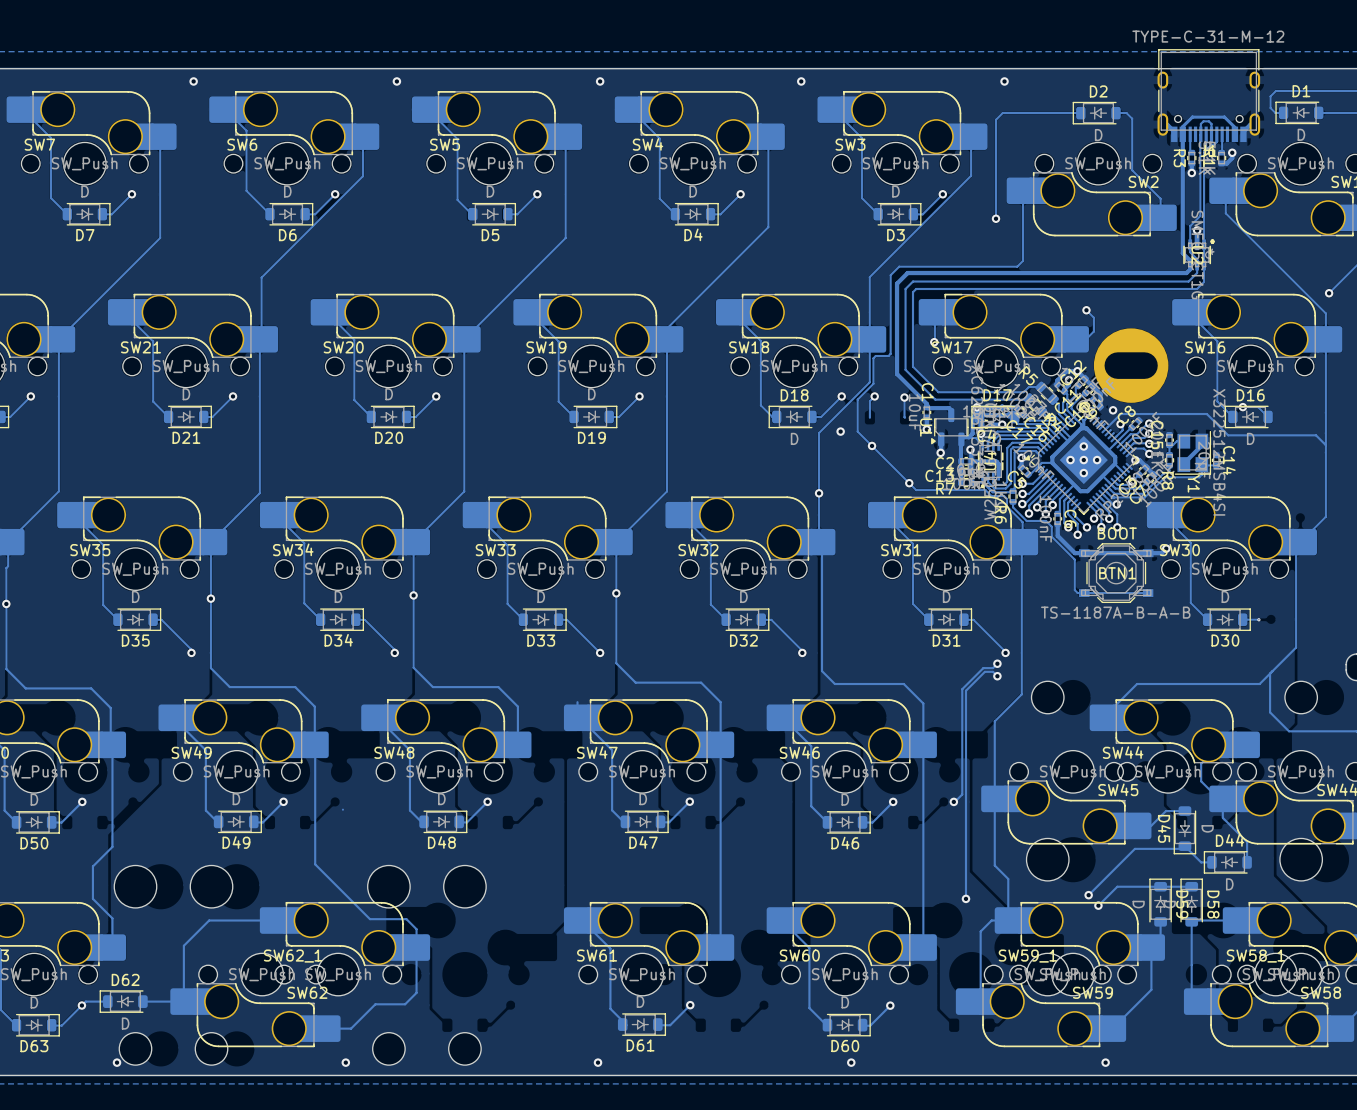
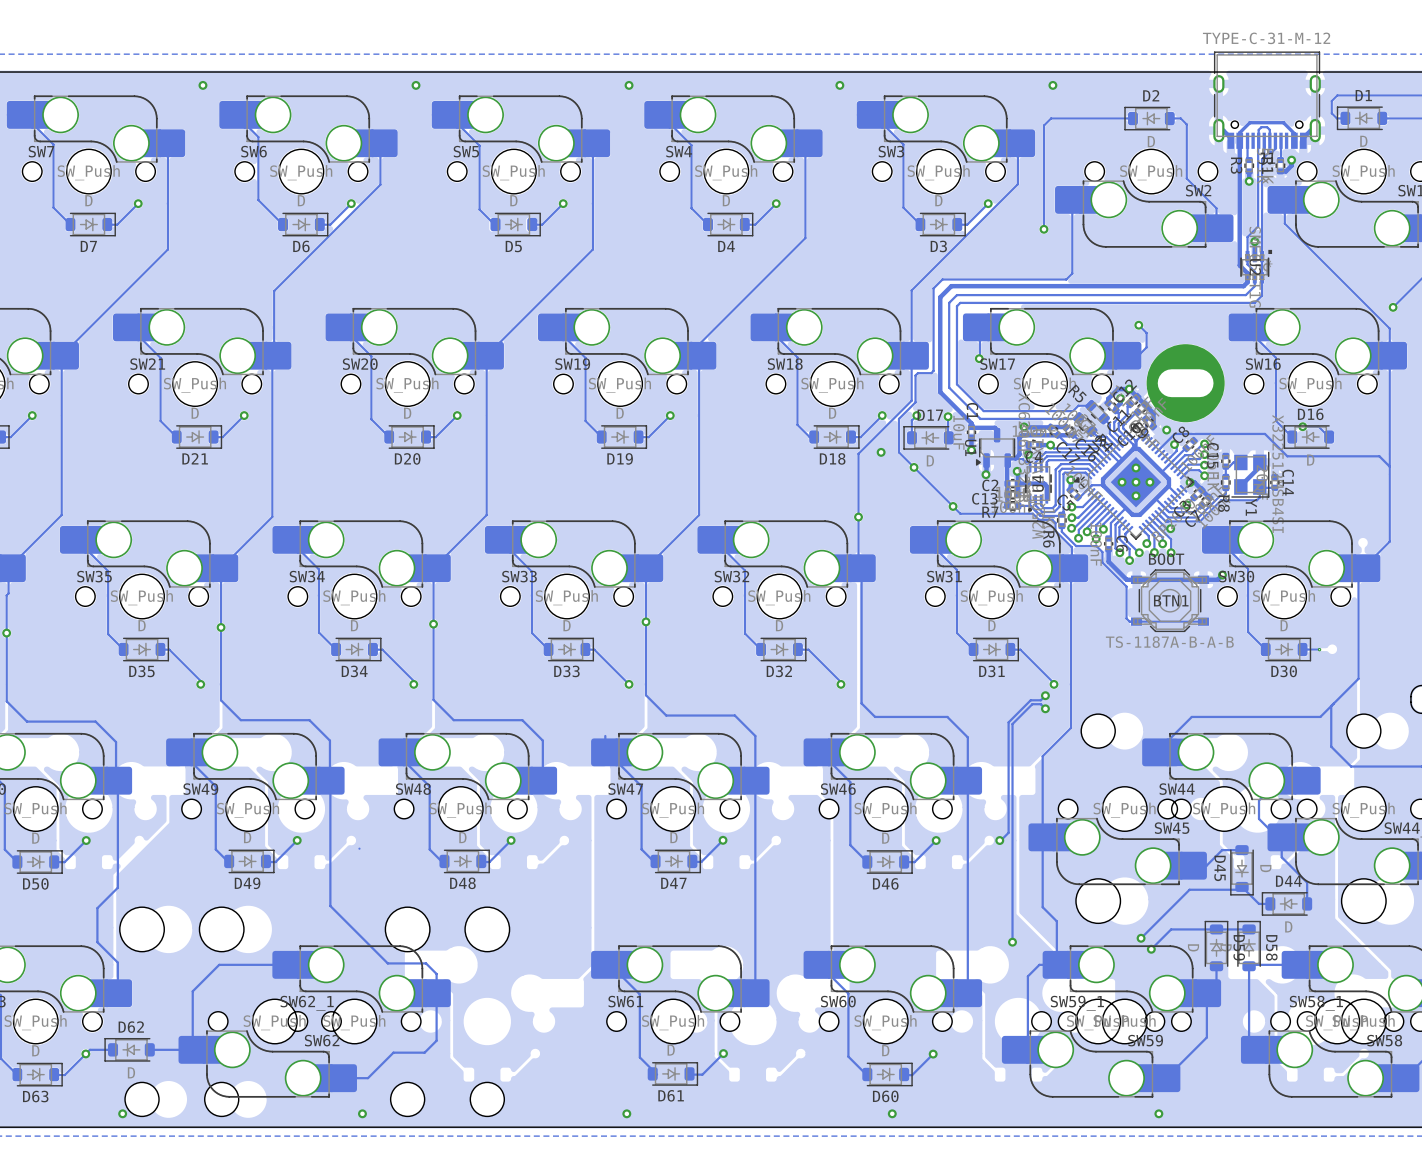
D18 rotation: 0° (792, 416) -> 180° (834, 437)
D17 position: (995, 416) -> (928, 437)

